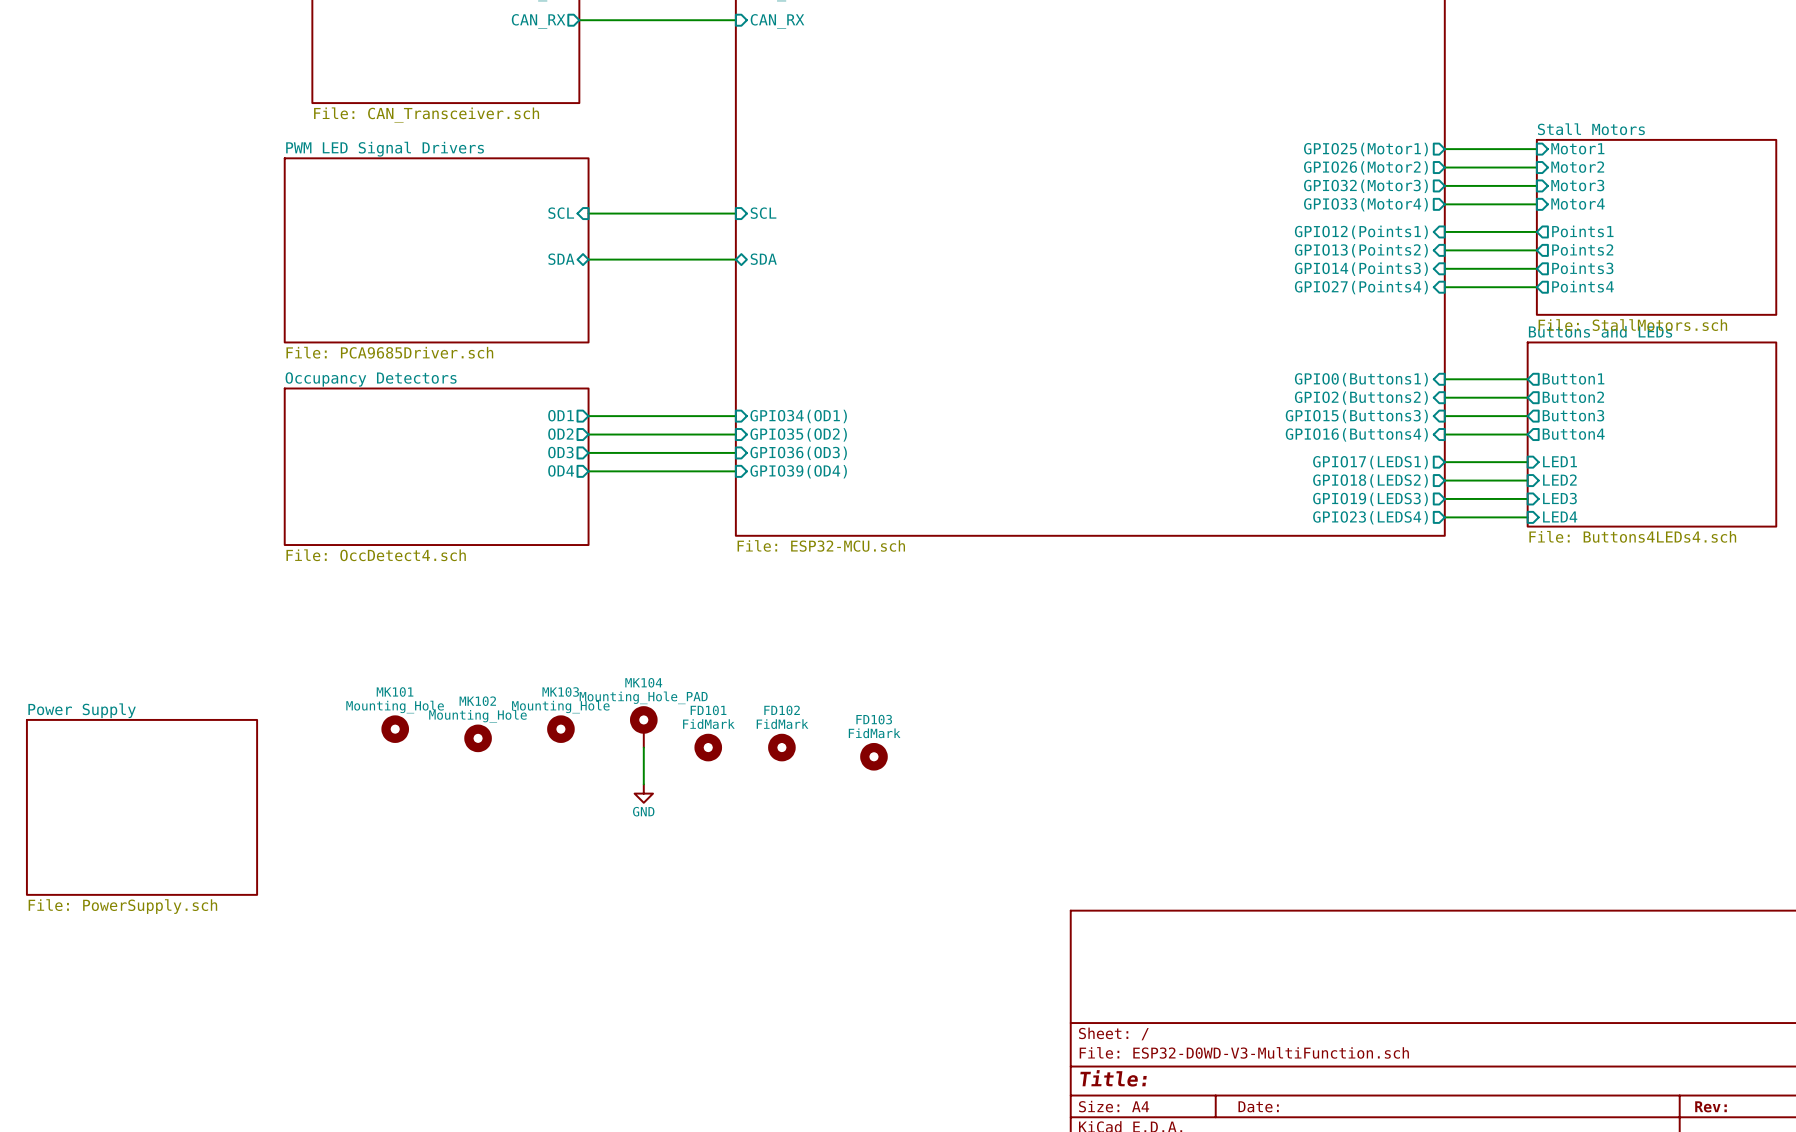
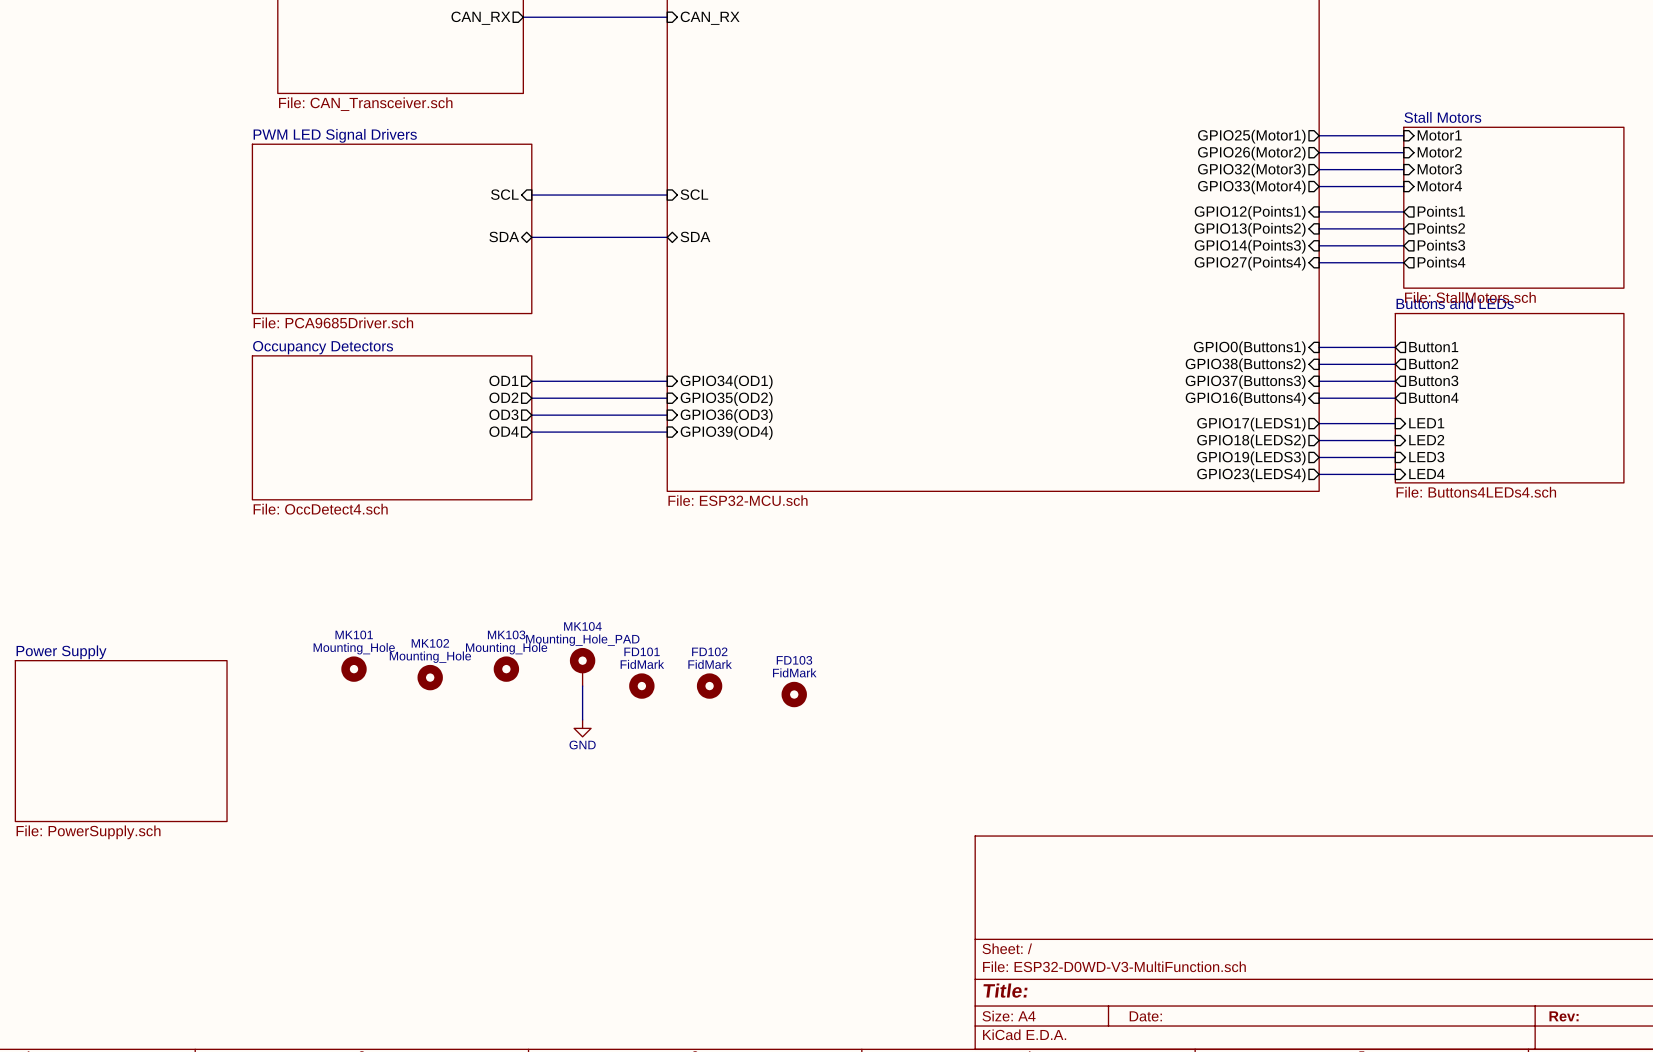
sheet pin: GPIO2(Buttons2) (1361, 398) -> GPIO38(Buttons2) (1245, 365)
sheet pin: GPIO15(Buttons3) (1356, 416) -> GPIO37(Buttons3) (1245, 382)

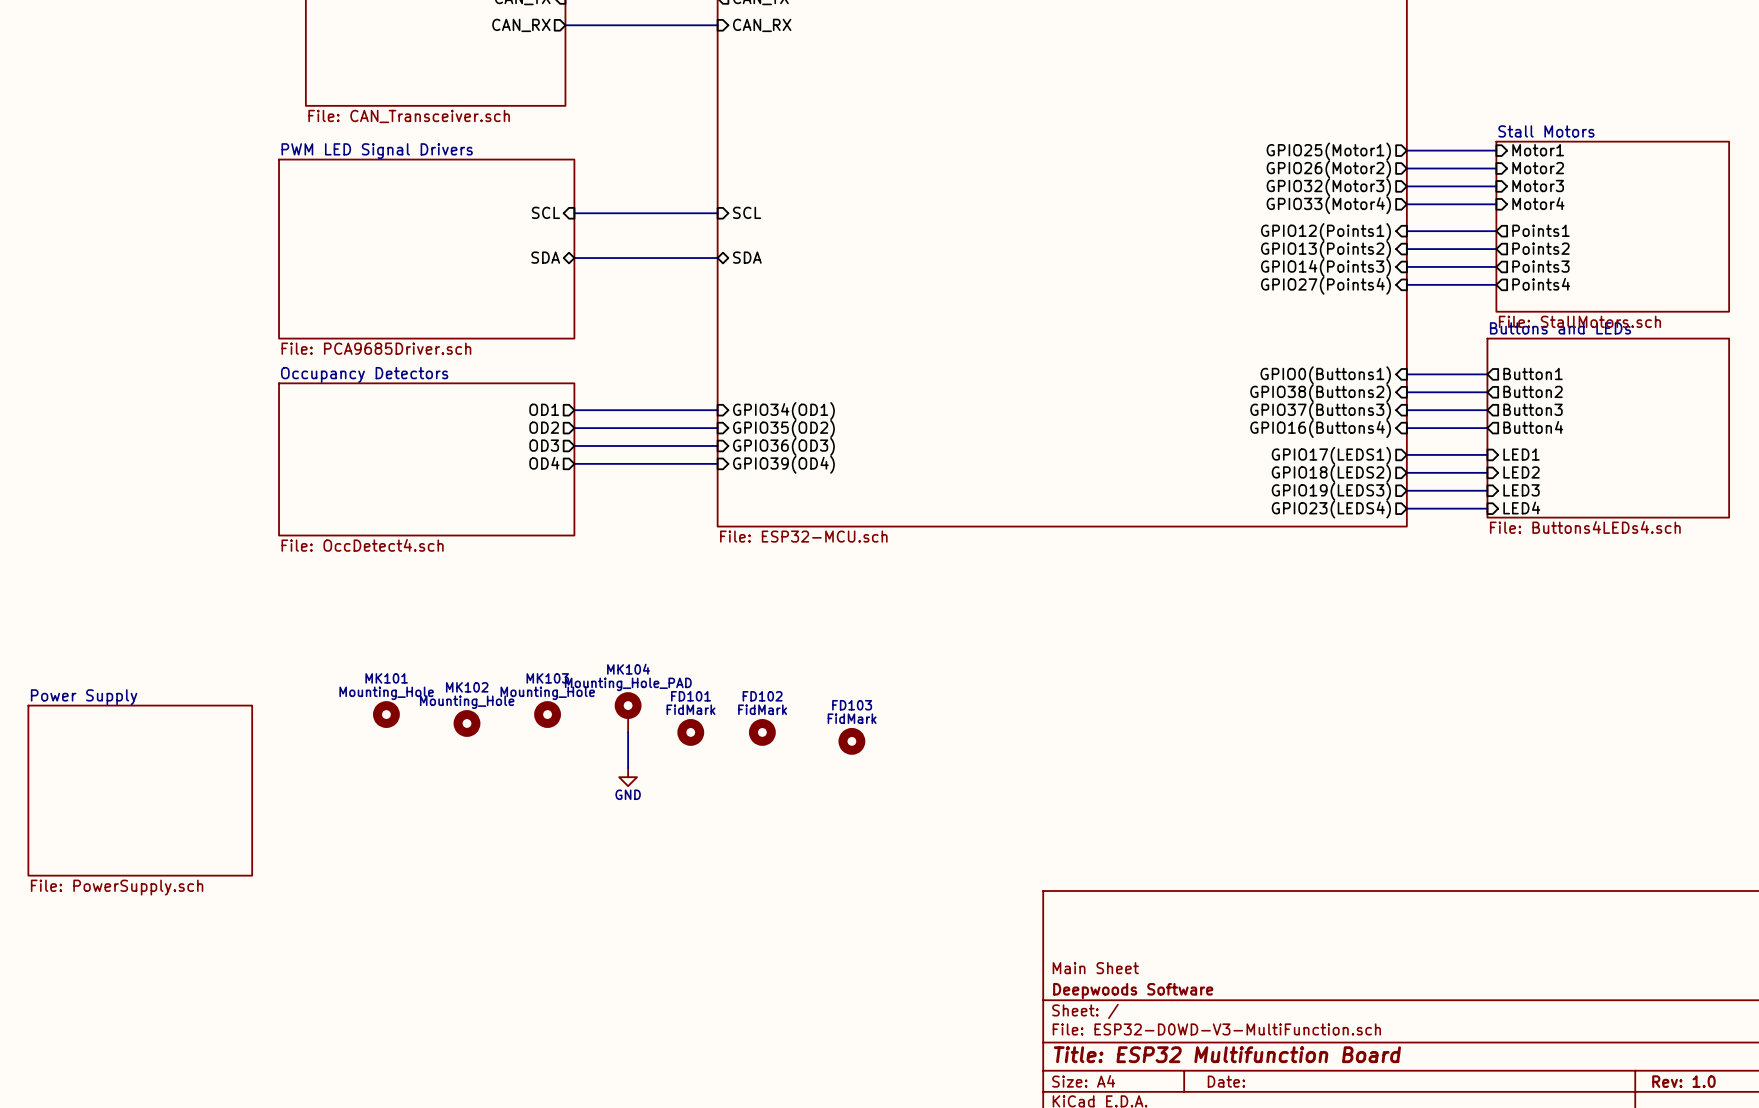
title block: none -> Main Sheet (1095, 968)
title block: none -> Deepwoods Software (1133, 991)
title block: Title: (1005, 990) -> Title: ESP32 Multifunction Board (1227, 1054)
title block: Rev: (1564, 1016) -> Rev: 1.0 (1683, 1081)

